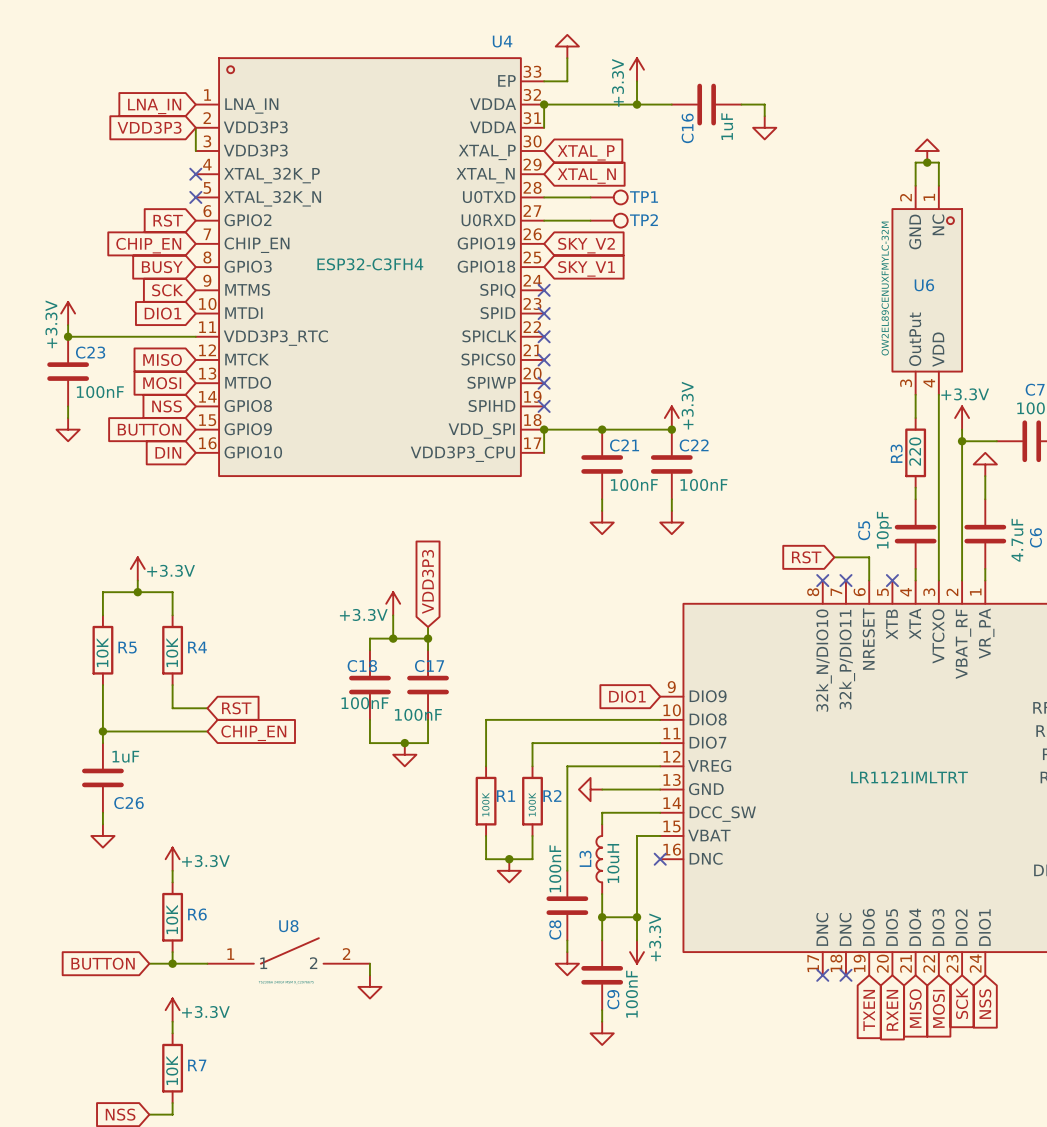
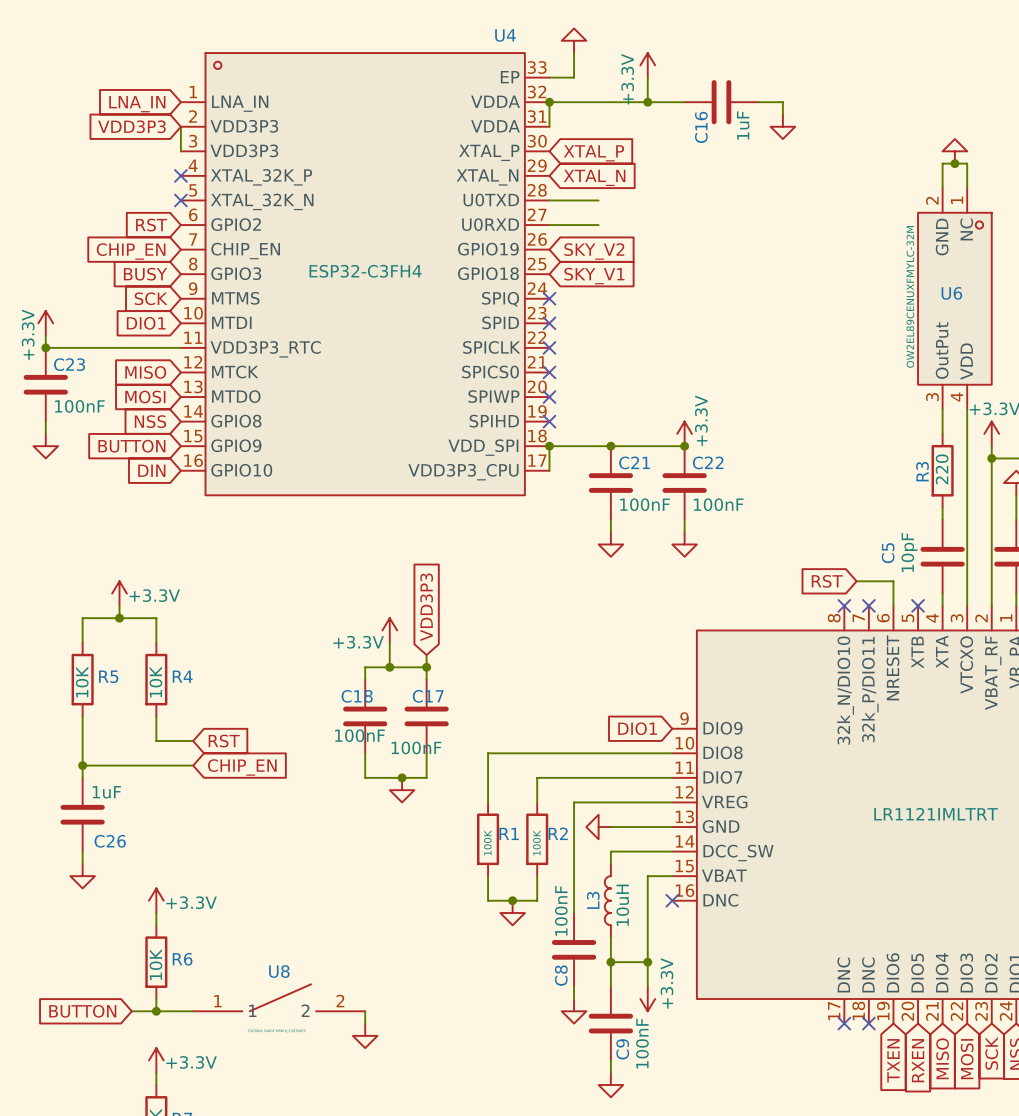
TP1: (609, 197) -> none
TP2: (609, 220) -> none

